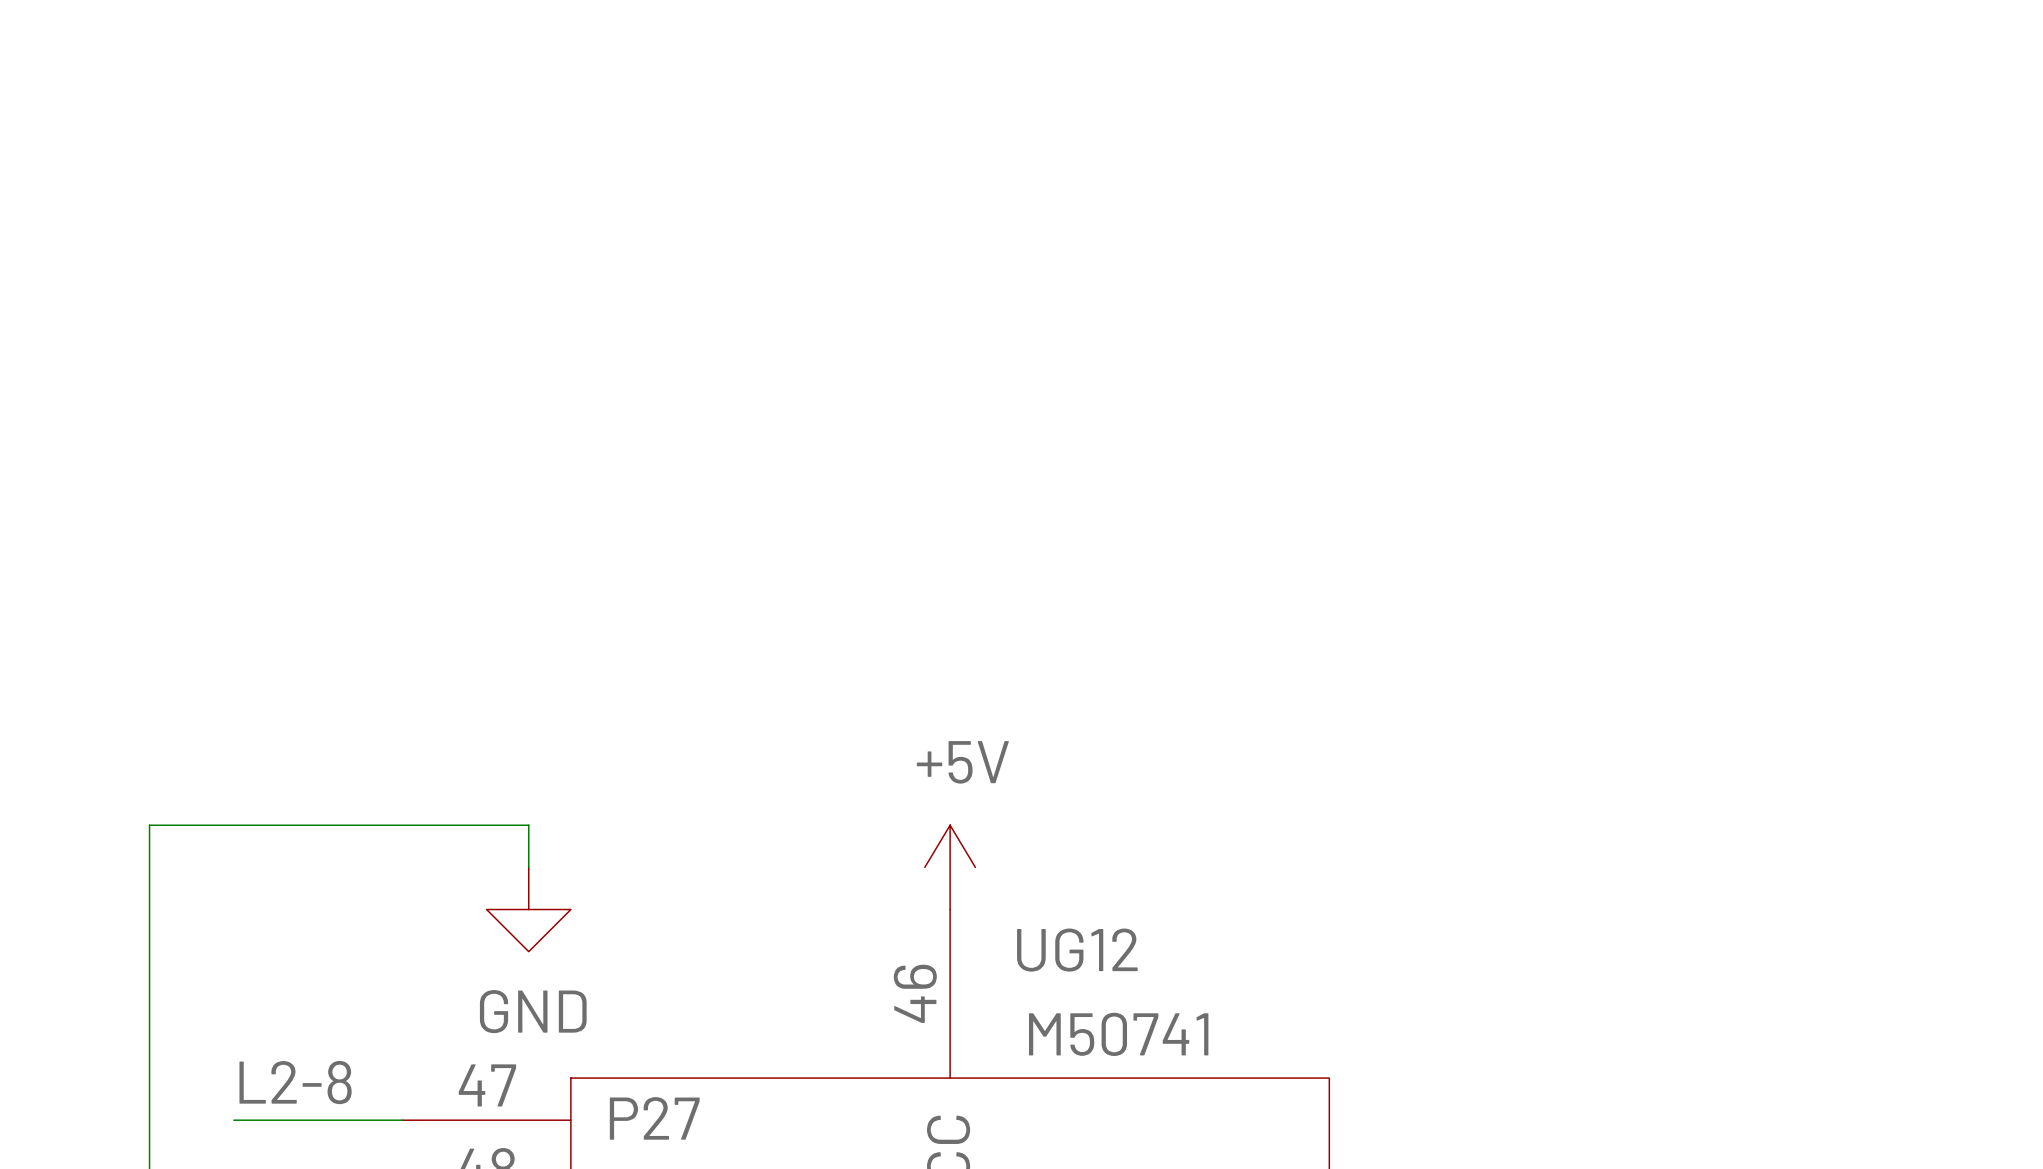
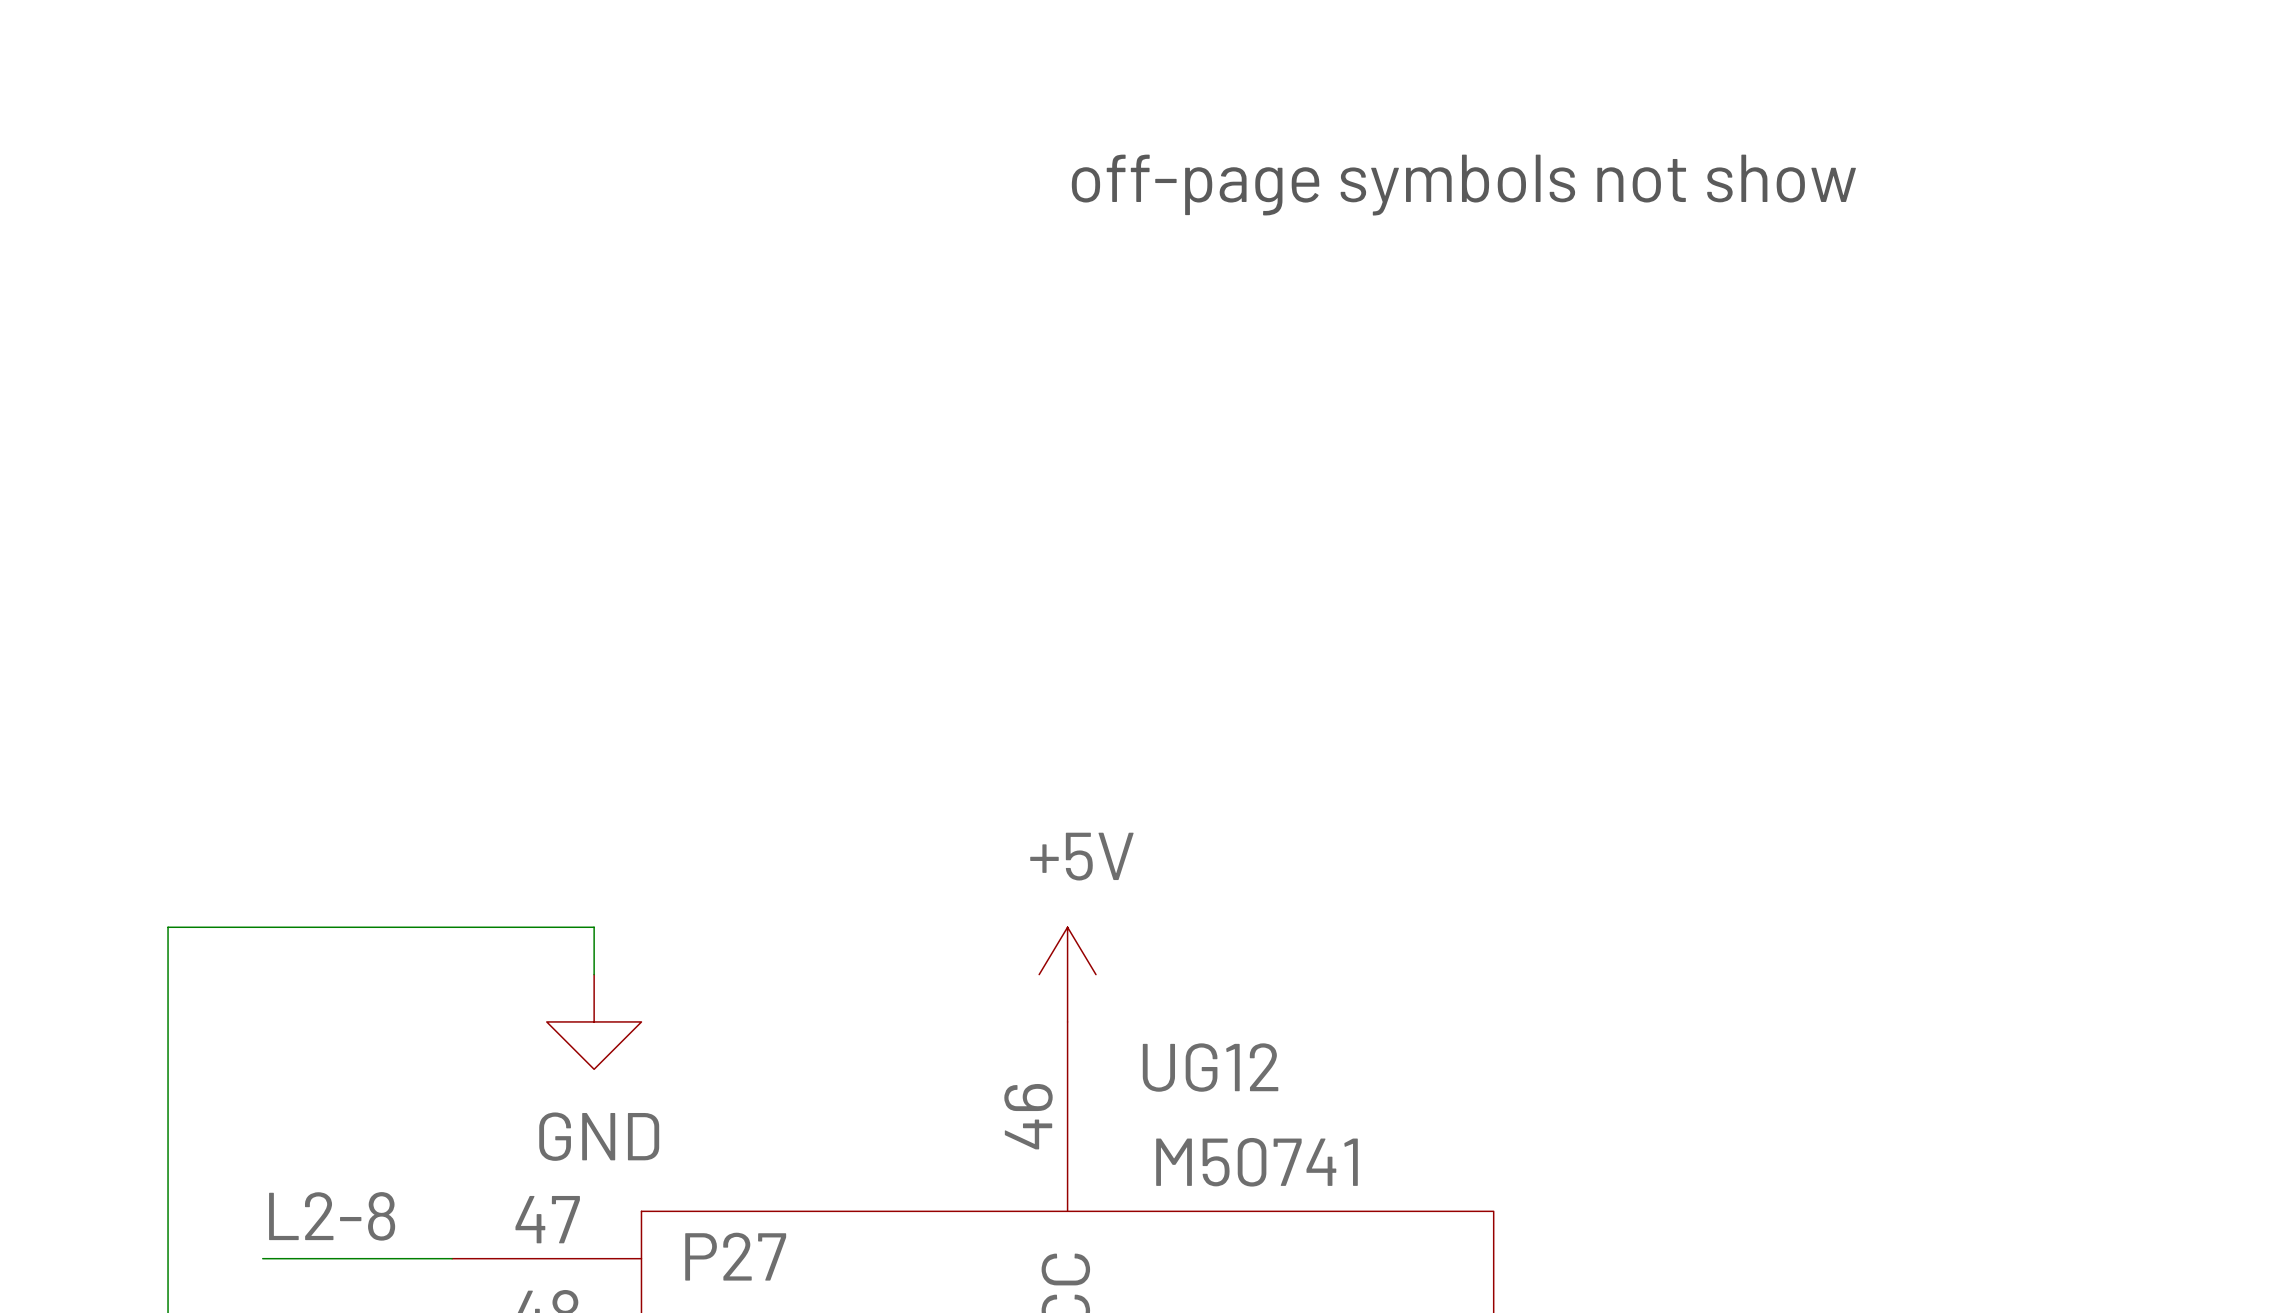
text: none -> off-page symbols not show (1463, 185)

